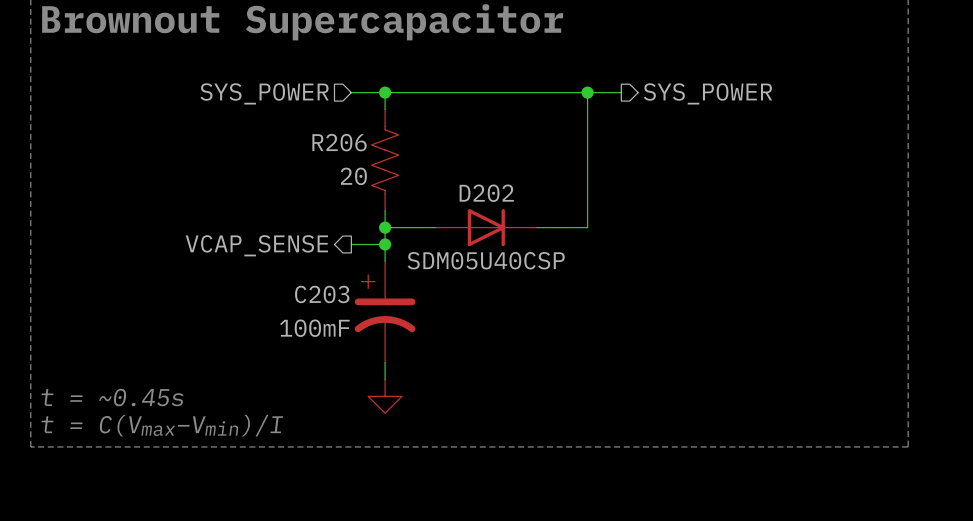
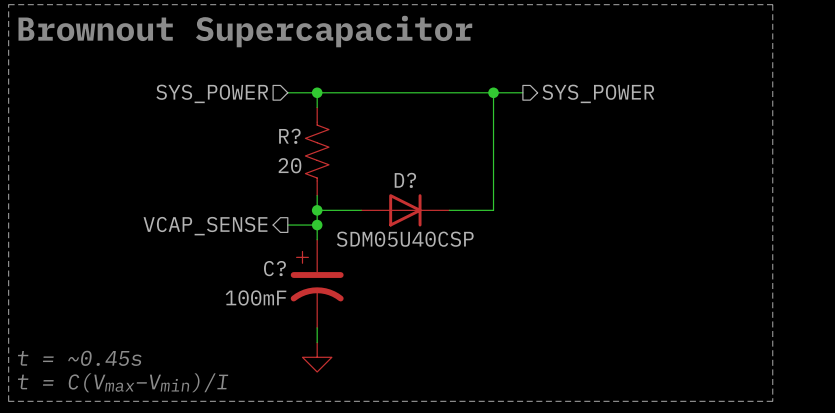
R206 name: R206 (339, 142) -> R? (289, 136)
D202 name: D202 (486, 193) -> D? (405, 180)
C203 name: C203 (322, 294) -> C? (274, 268)

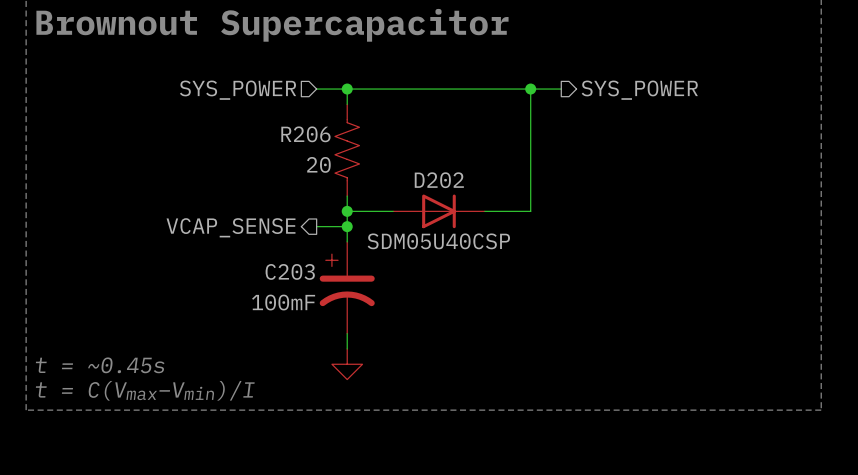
R? name: R? (289, 136) -> R206 (305, 134)
D? name: D? (405, 180) -> D202 (439, 180)
C? name: C? (274, 268) -> C203 (290, 271)

